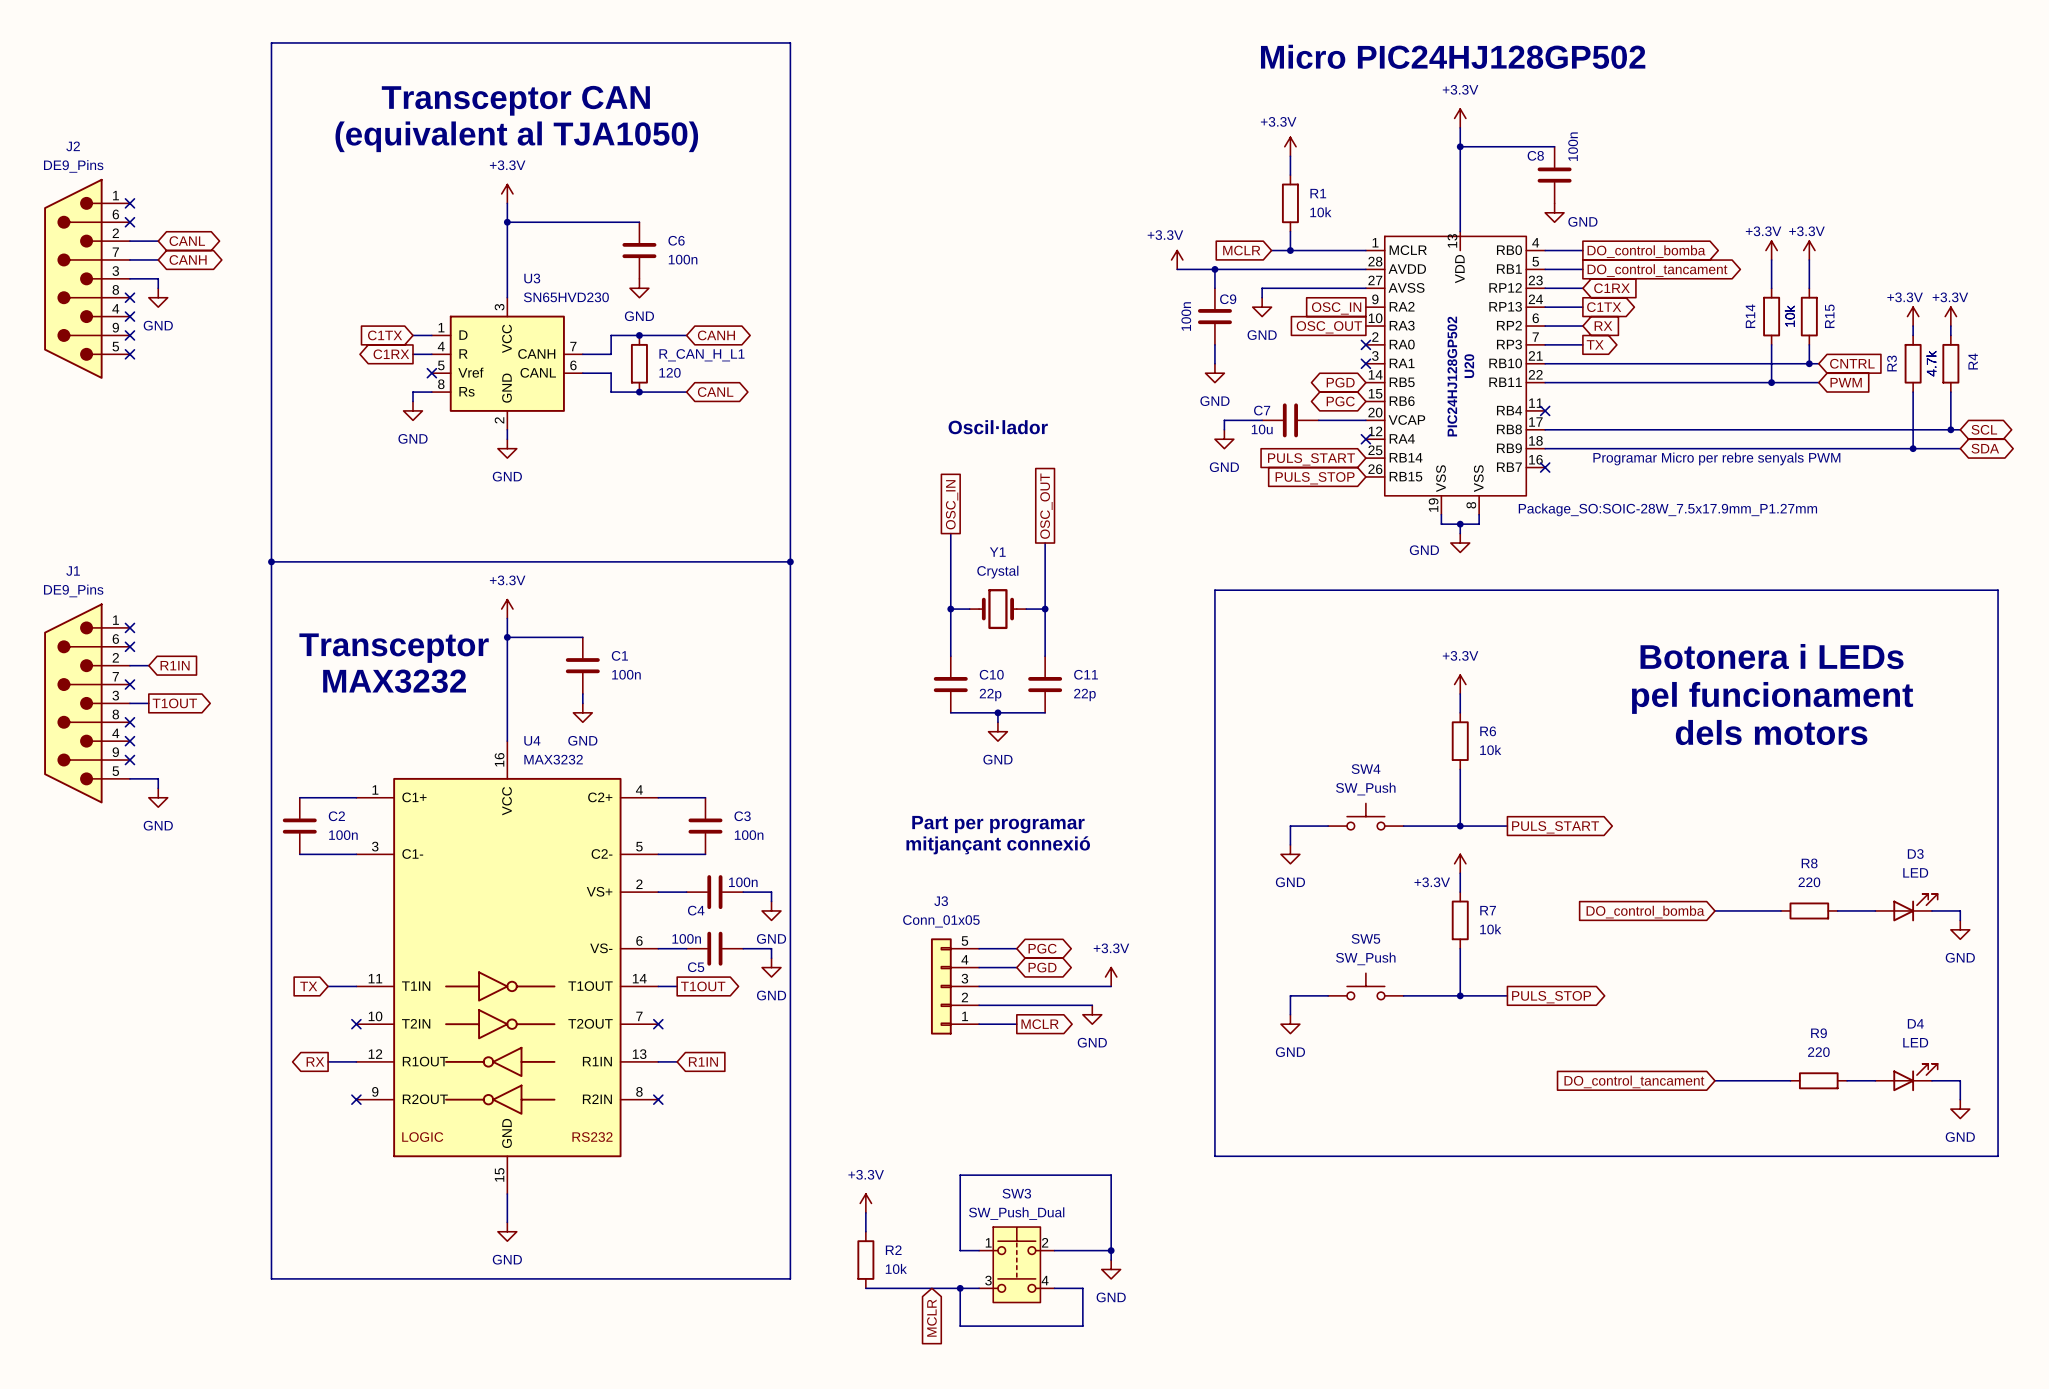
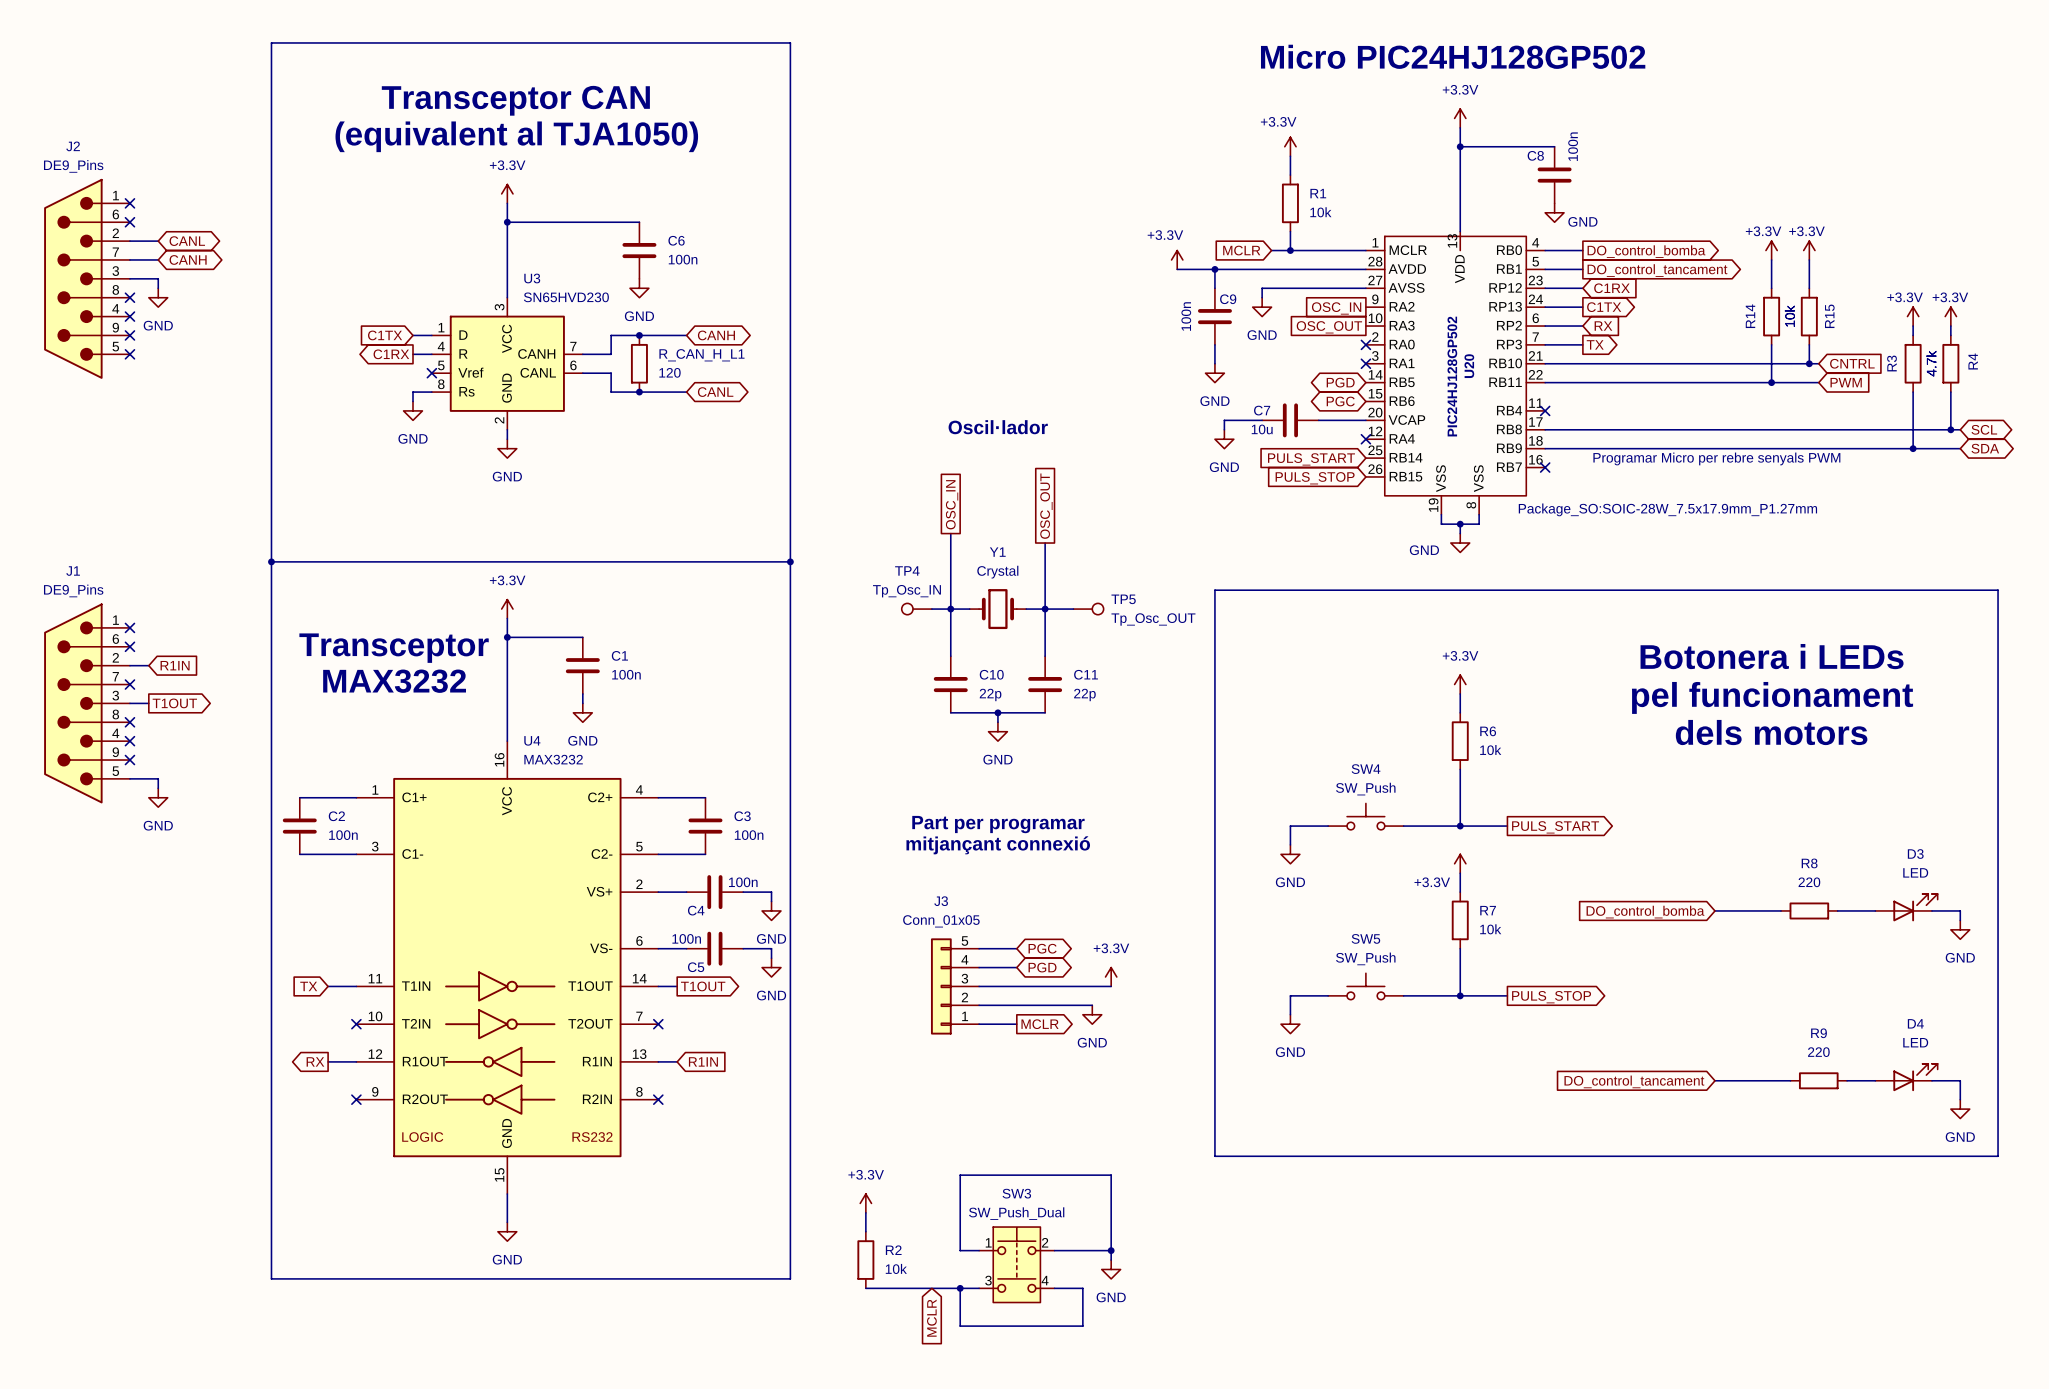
TP4: none -> Tp_Osc_IN (916, 609)
wire: none -> (931, 609) (950, 609)
wire: none -> (1045, 609) (1073, 609)
TP5: none -> Tp_Osc_OUT (1088, 609)

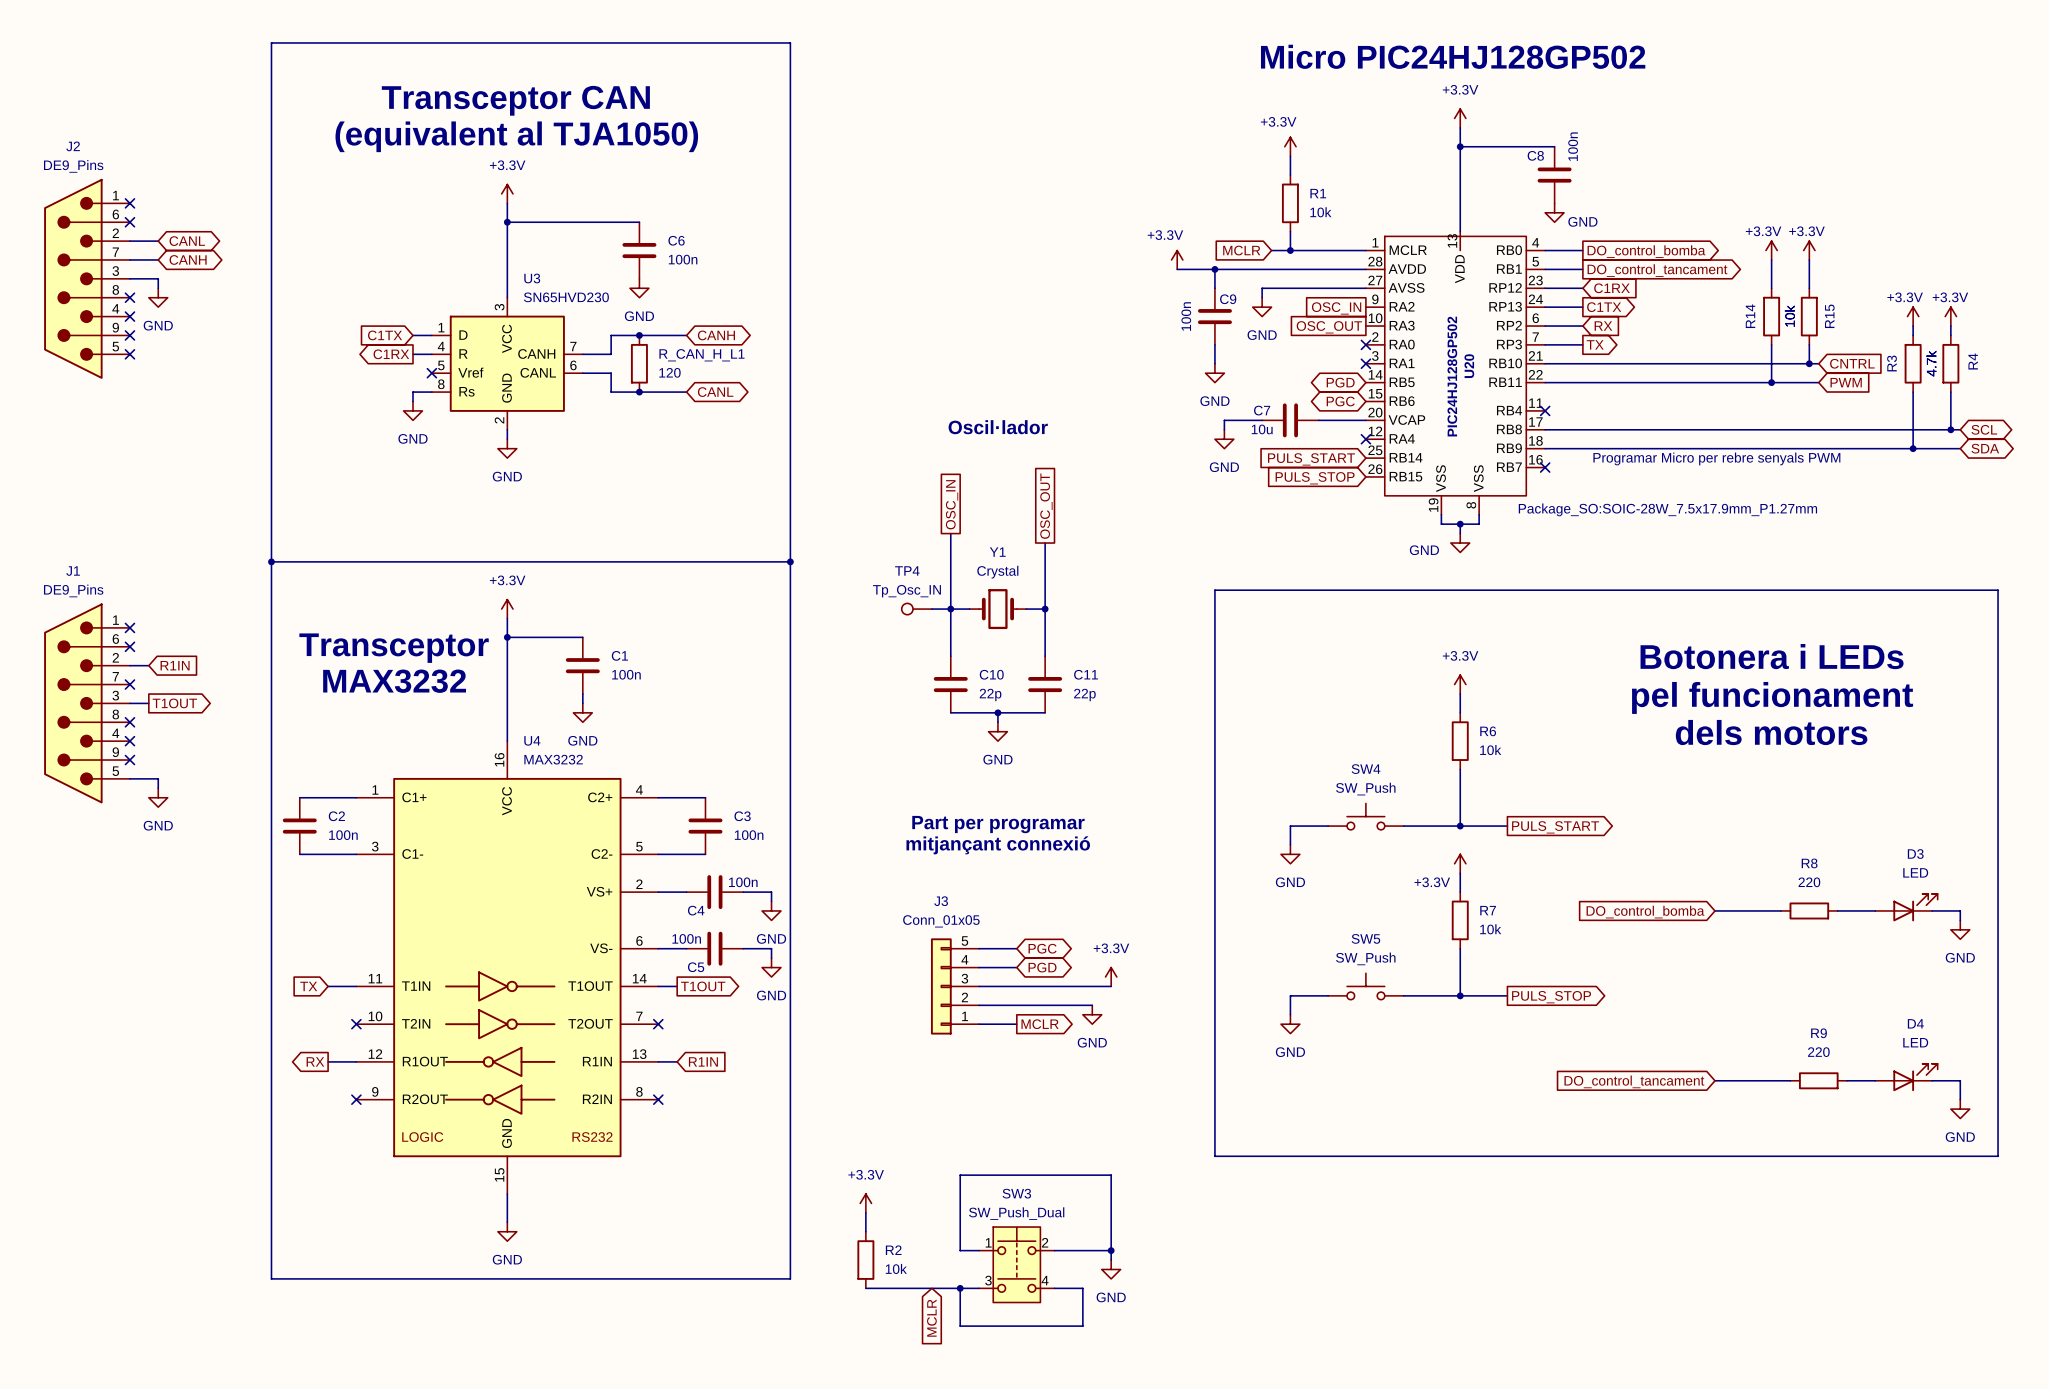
wire: (1045, 609) (1073, 609) -> none
TP5: Tp_Osc_OUT (1088, 609) -> none

